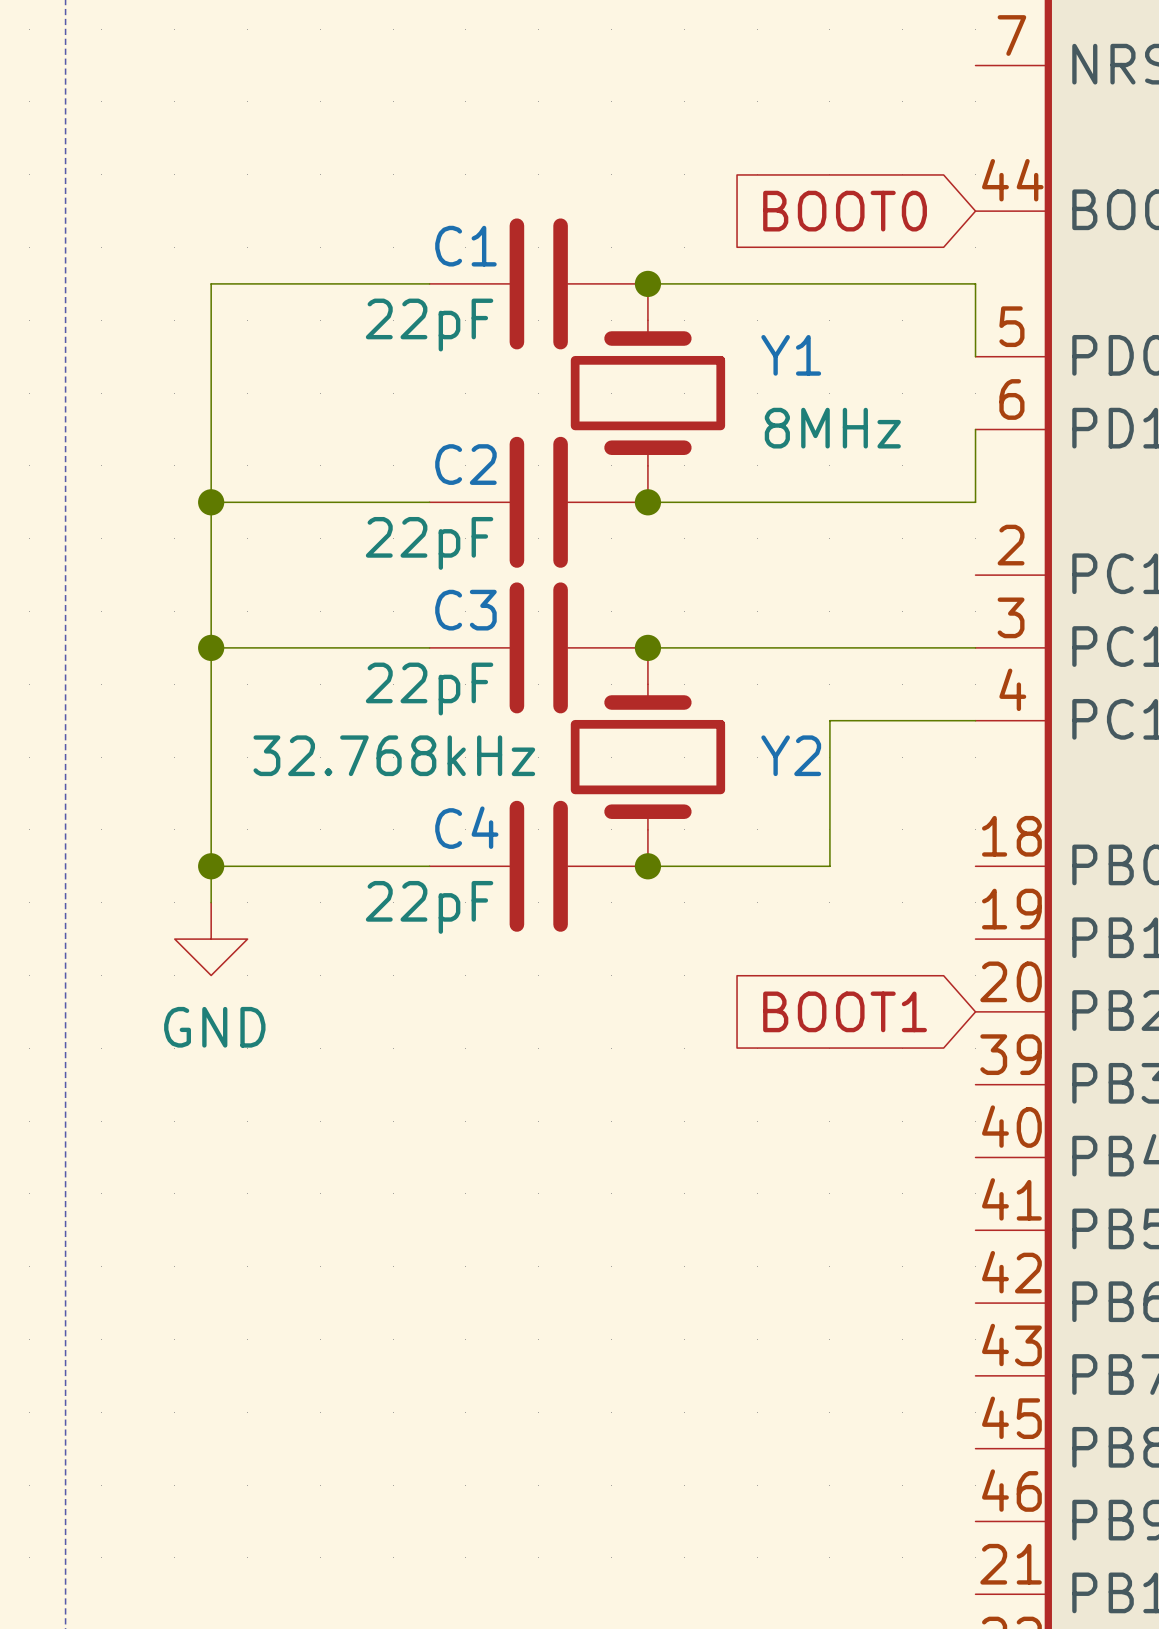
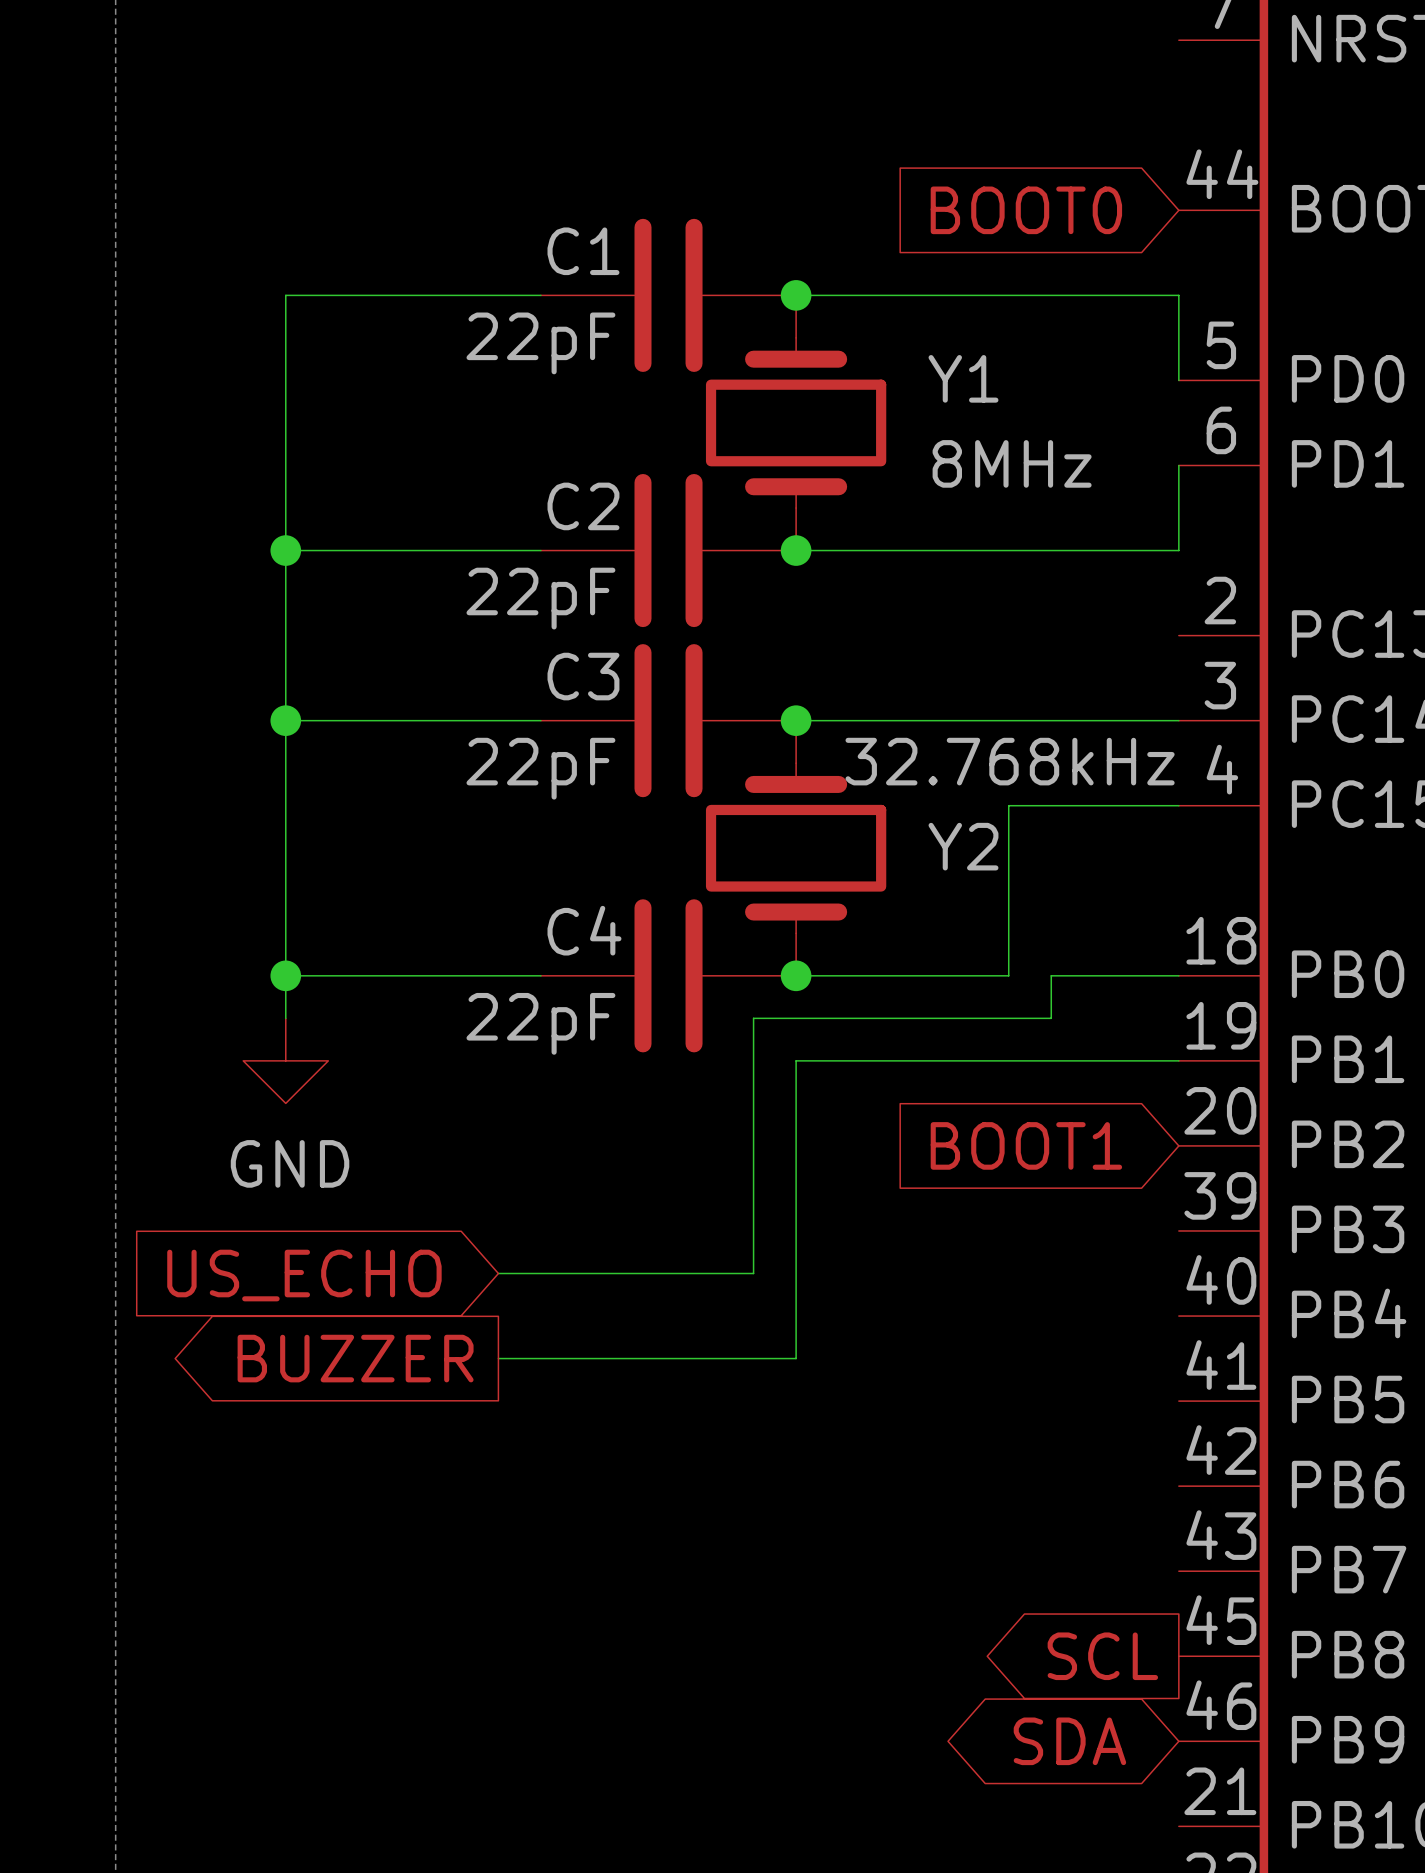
Y2 value position: 32.768kHz (394, 755) -> 32.768kHz (1010, 761)
wire: none -> (1178, 975) (1051, 975) (1051, 1018) (753, 1018) (753, 1273) (498, 1273)
wire: none -> (1178, 1060) (796, 1060) (796, 1358) (498, 1358)
global label: none -> US_ECHO (304, 1275)
global label: none -> BUZZER (355, 1358)
global label: none -> SCL (1102, 1656)
global label: none -> SDA (1069, 1741)

